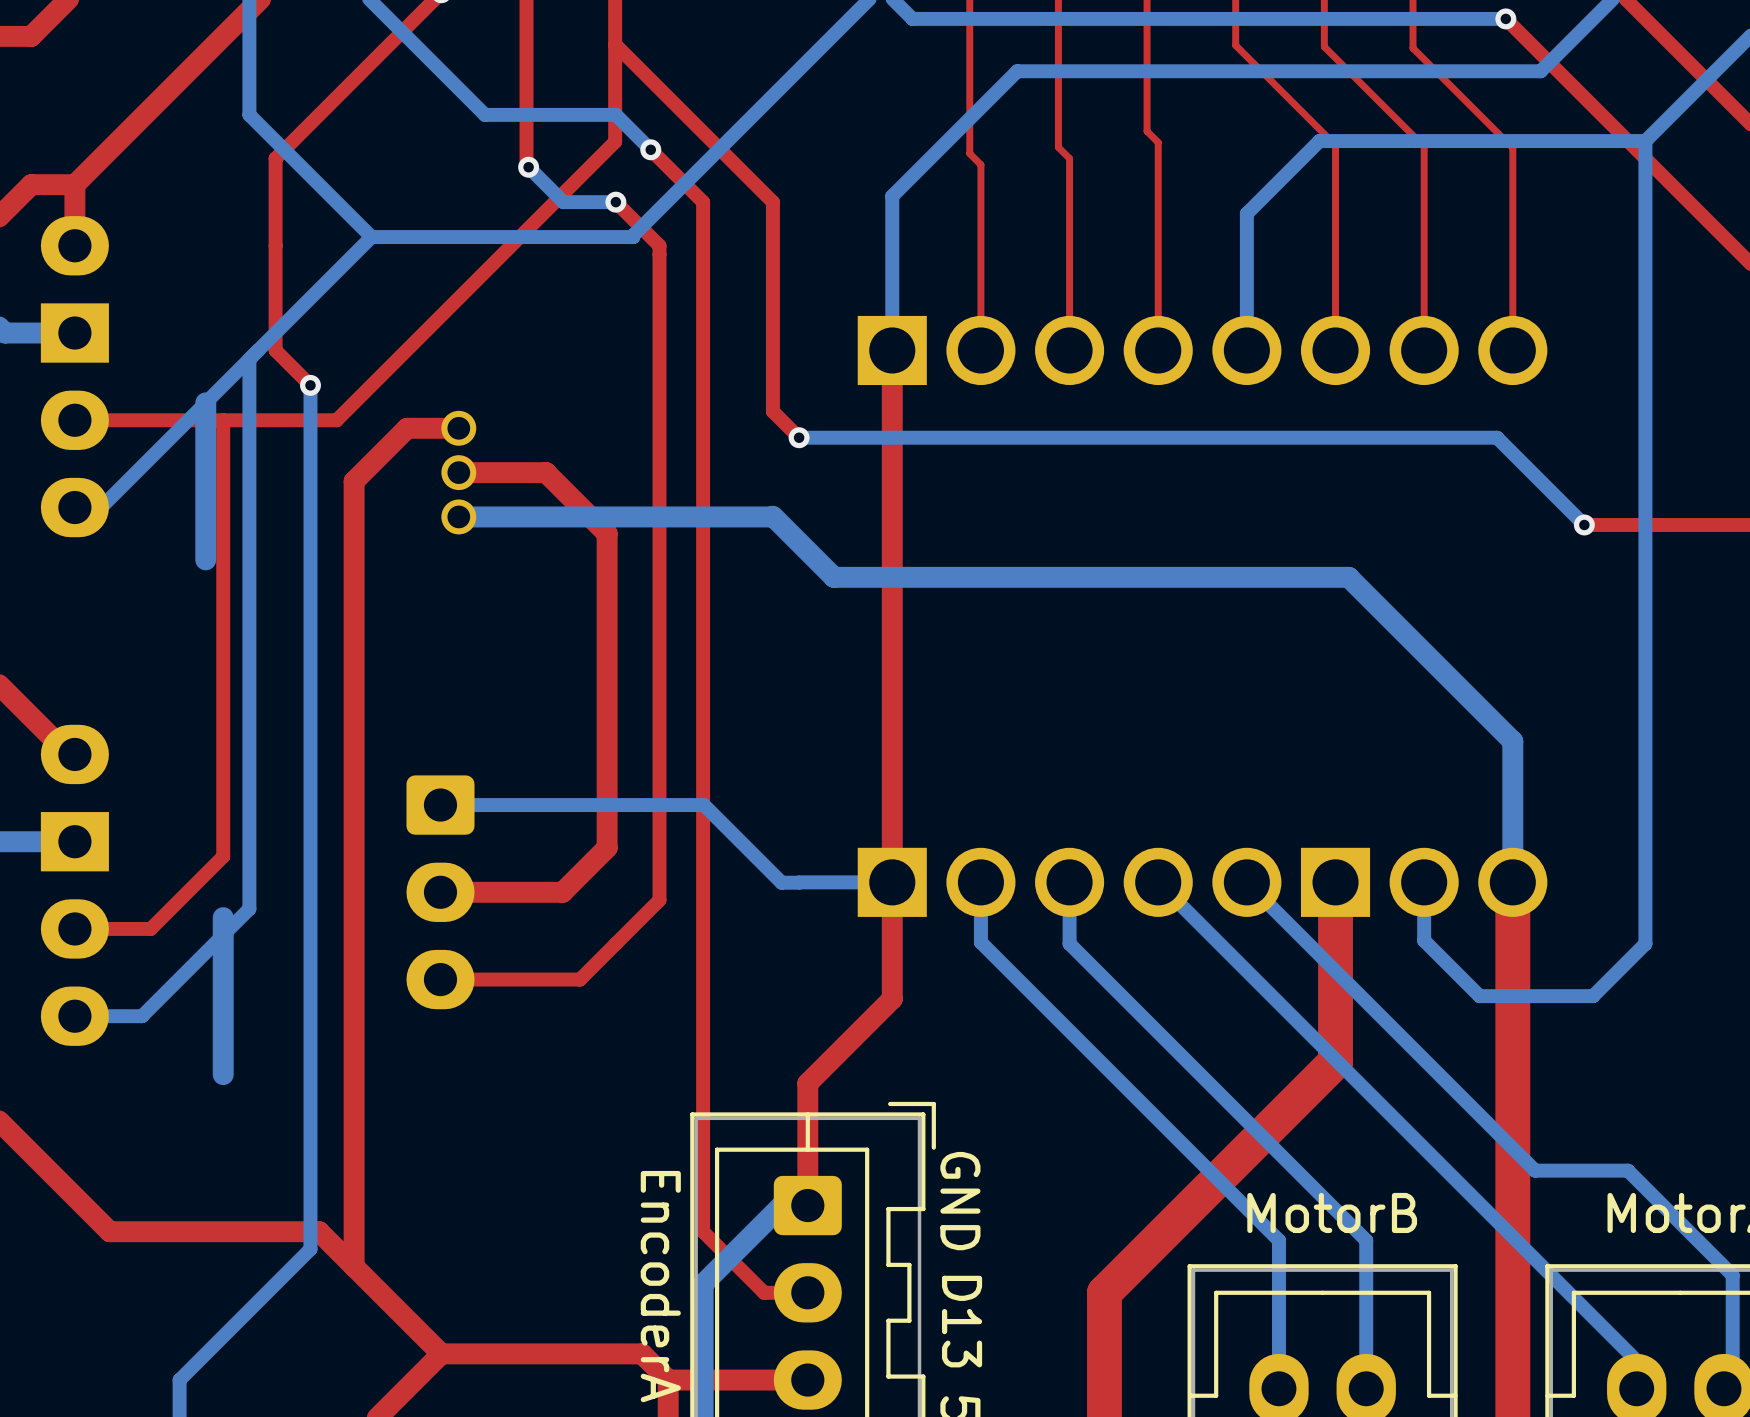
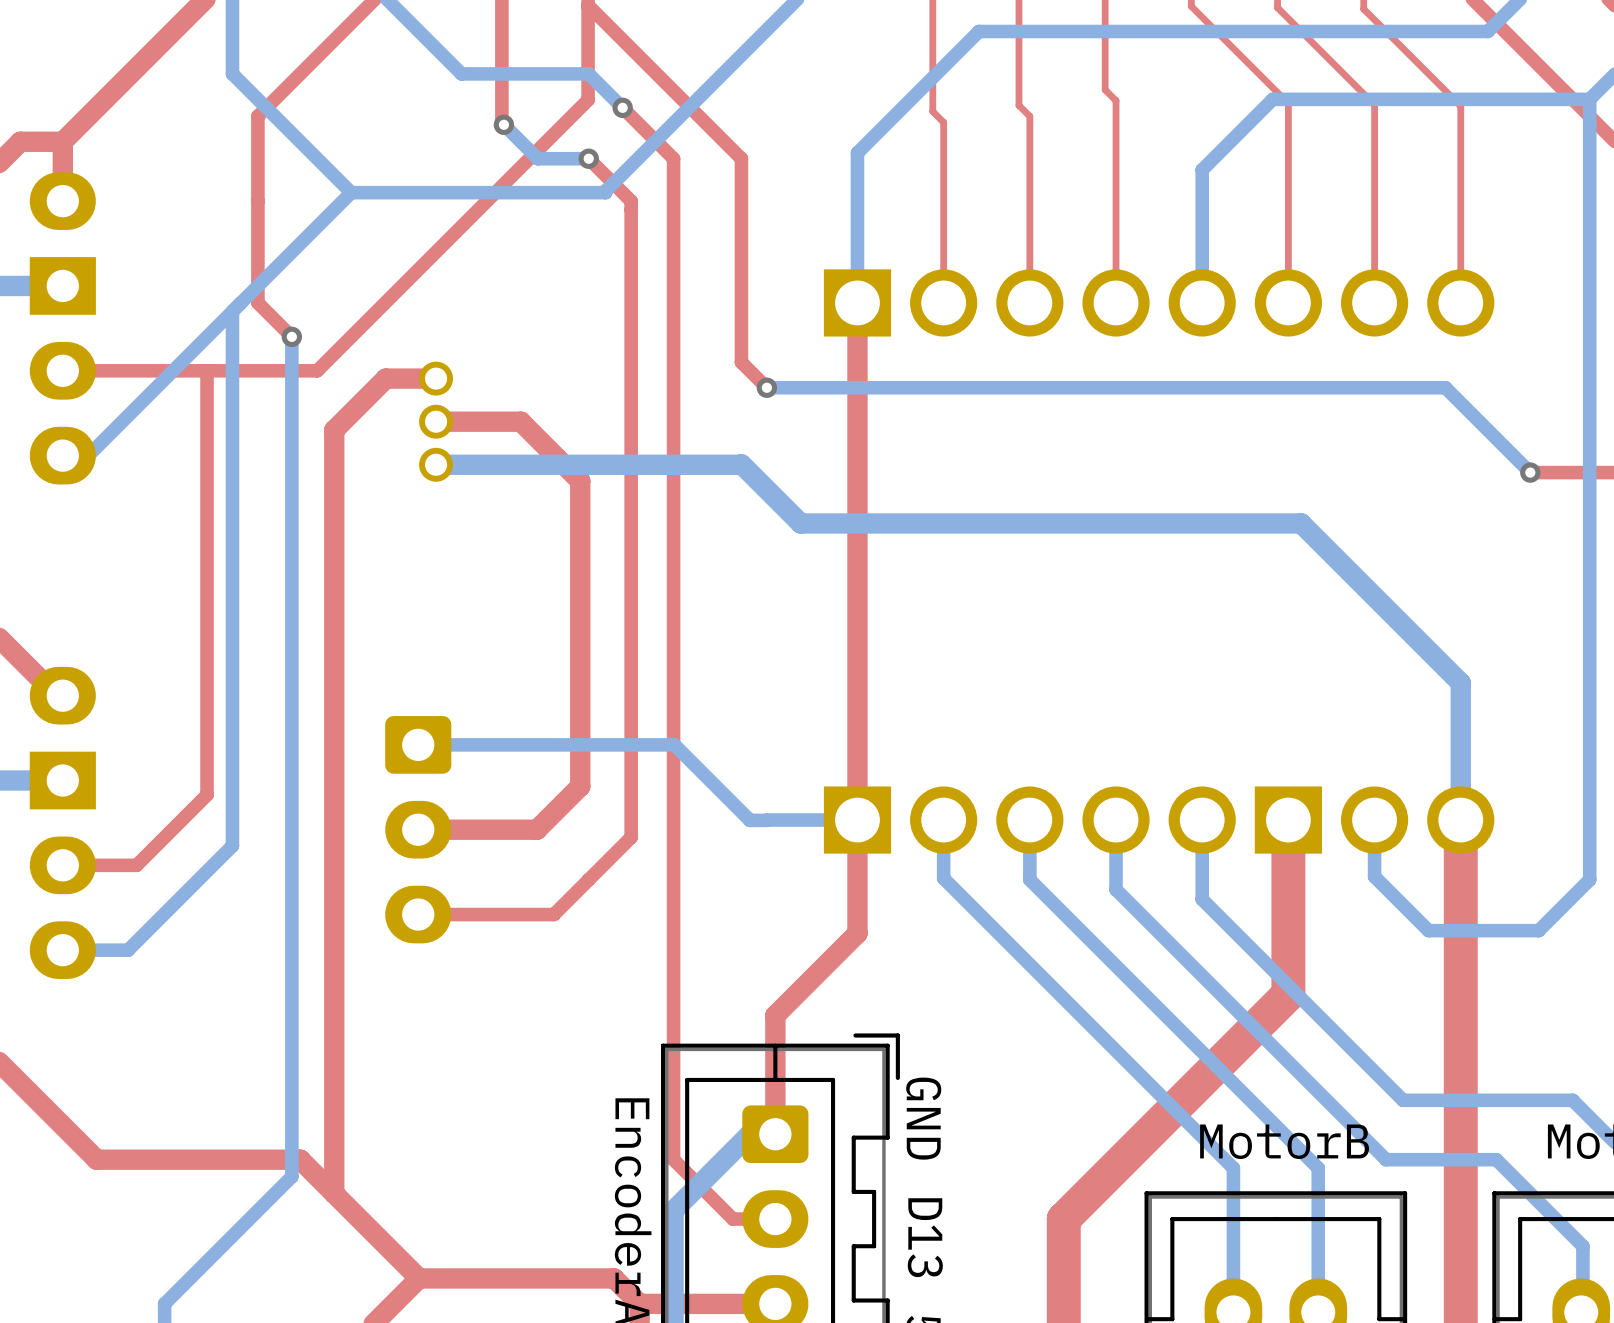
bottom track: (205, 402) (205, 559) -> none
bottom track: (1158, 882) (1638, 1362) -> (1116, 820) (1116, 889) (1386, 1159) (1496, 1159) (1582, 1246) (1582, 1286)
bottom track: (1246, 882) (1535, 1170) -> (1202, 820) (1202, 899) (1403, 1100) (1482, 1100)
bottom track: (223, 917) (223, 1074) -> none

